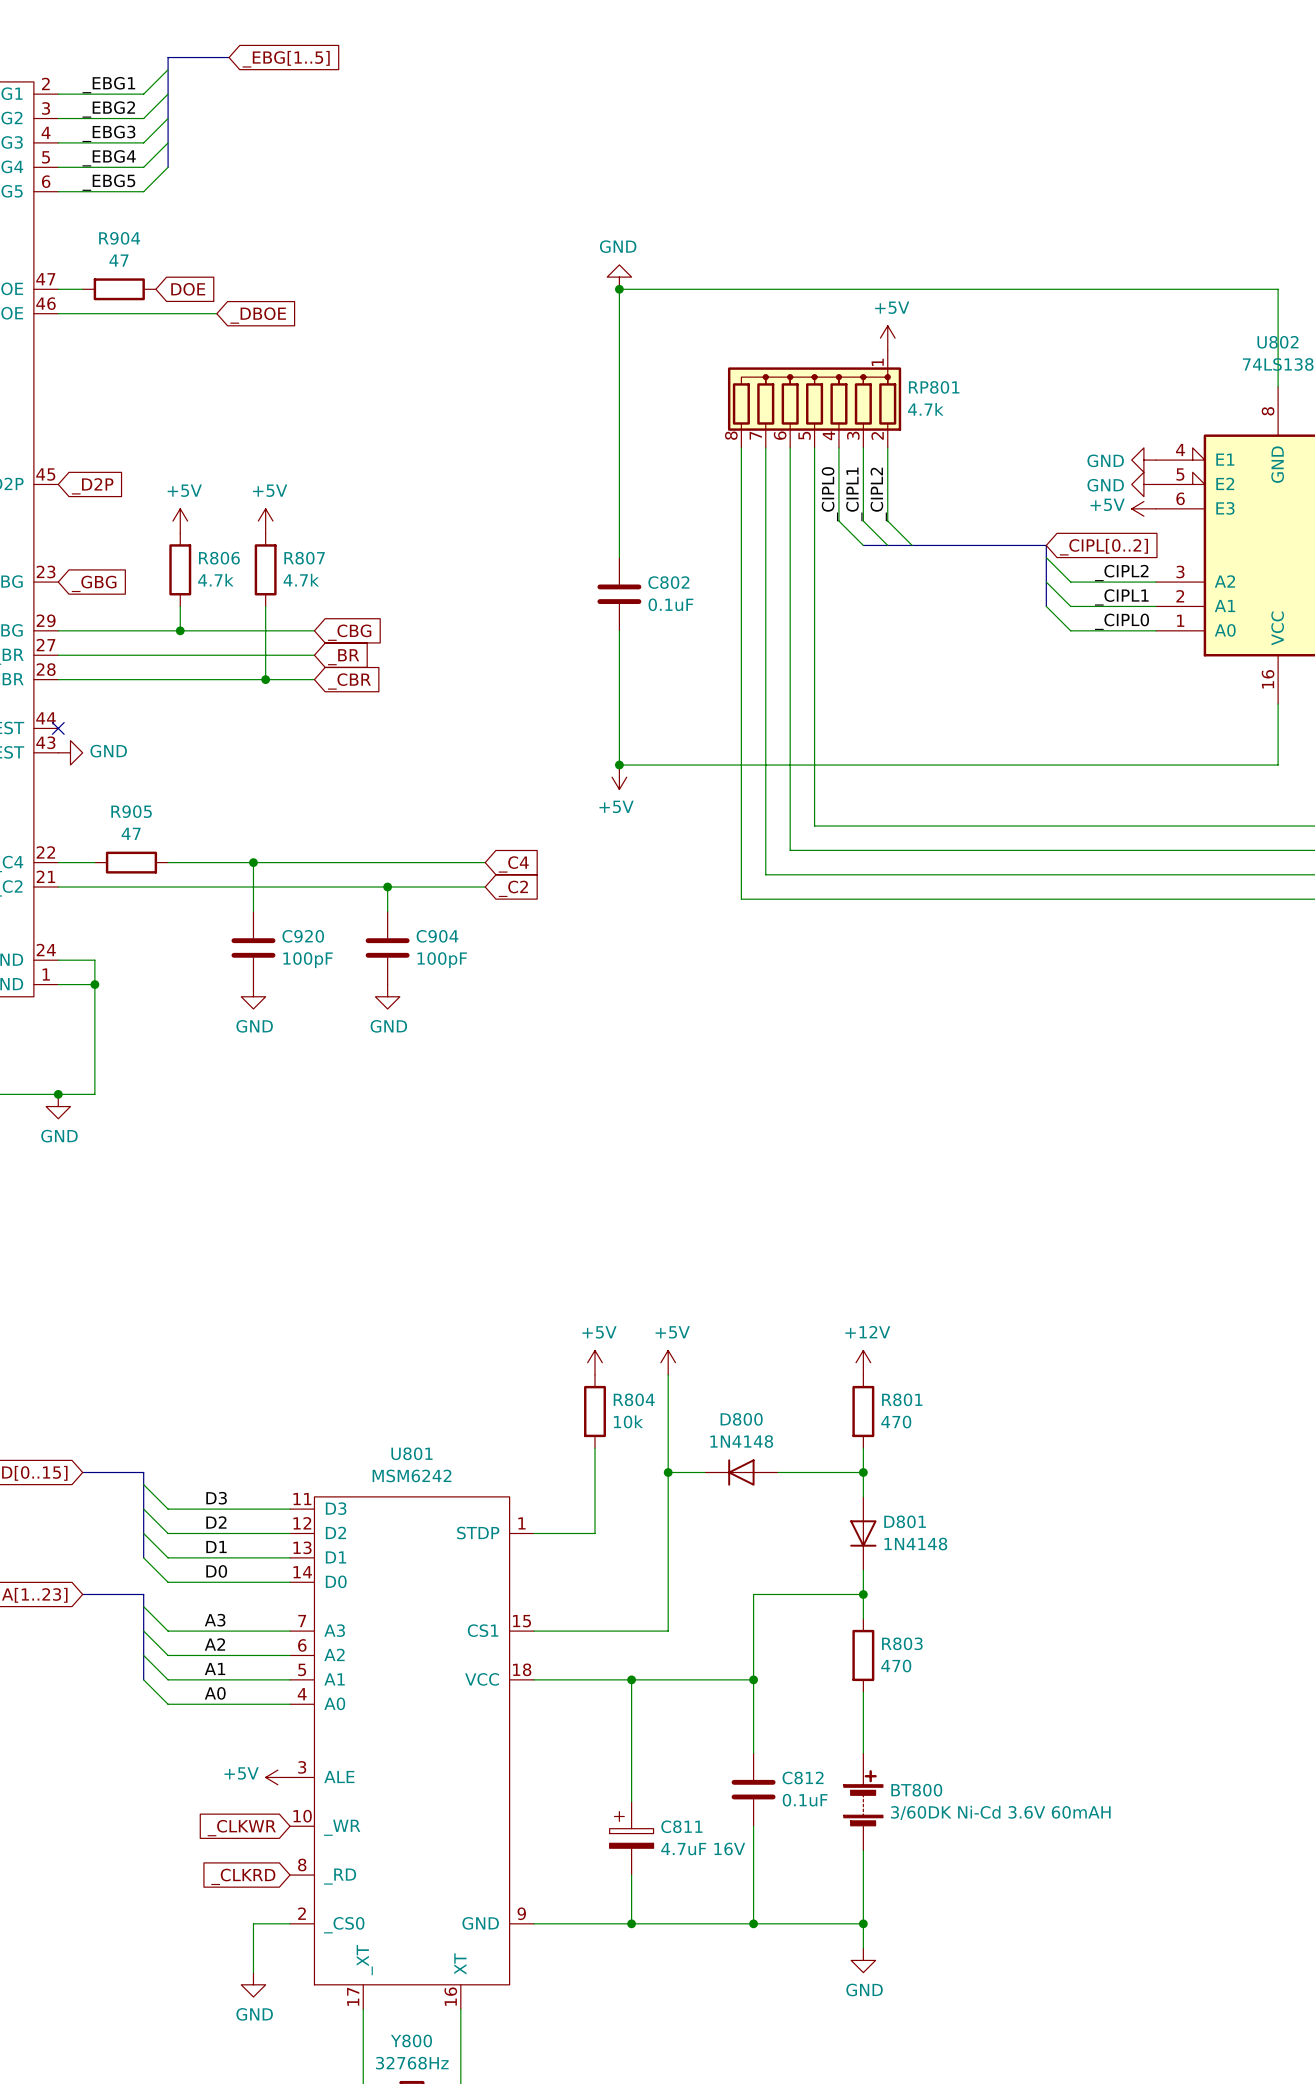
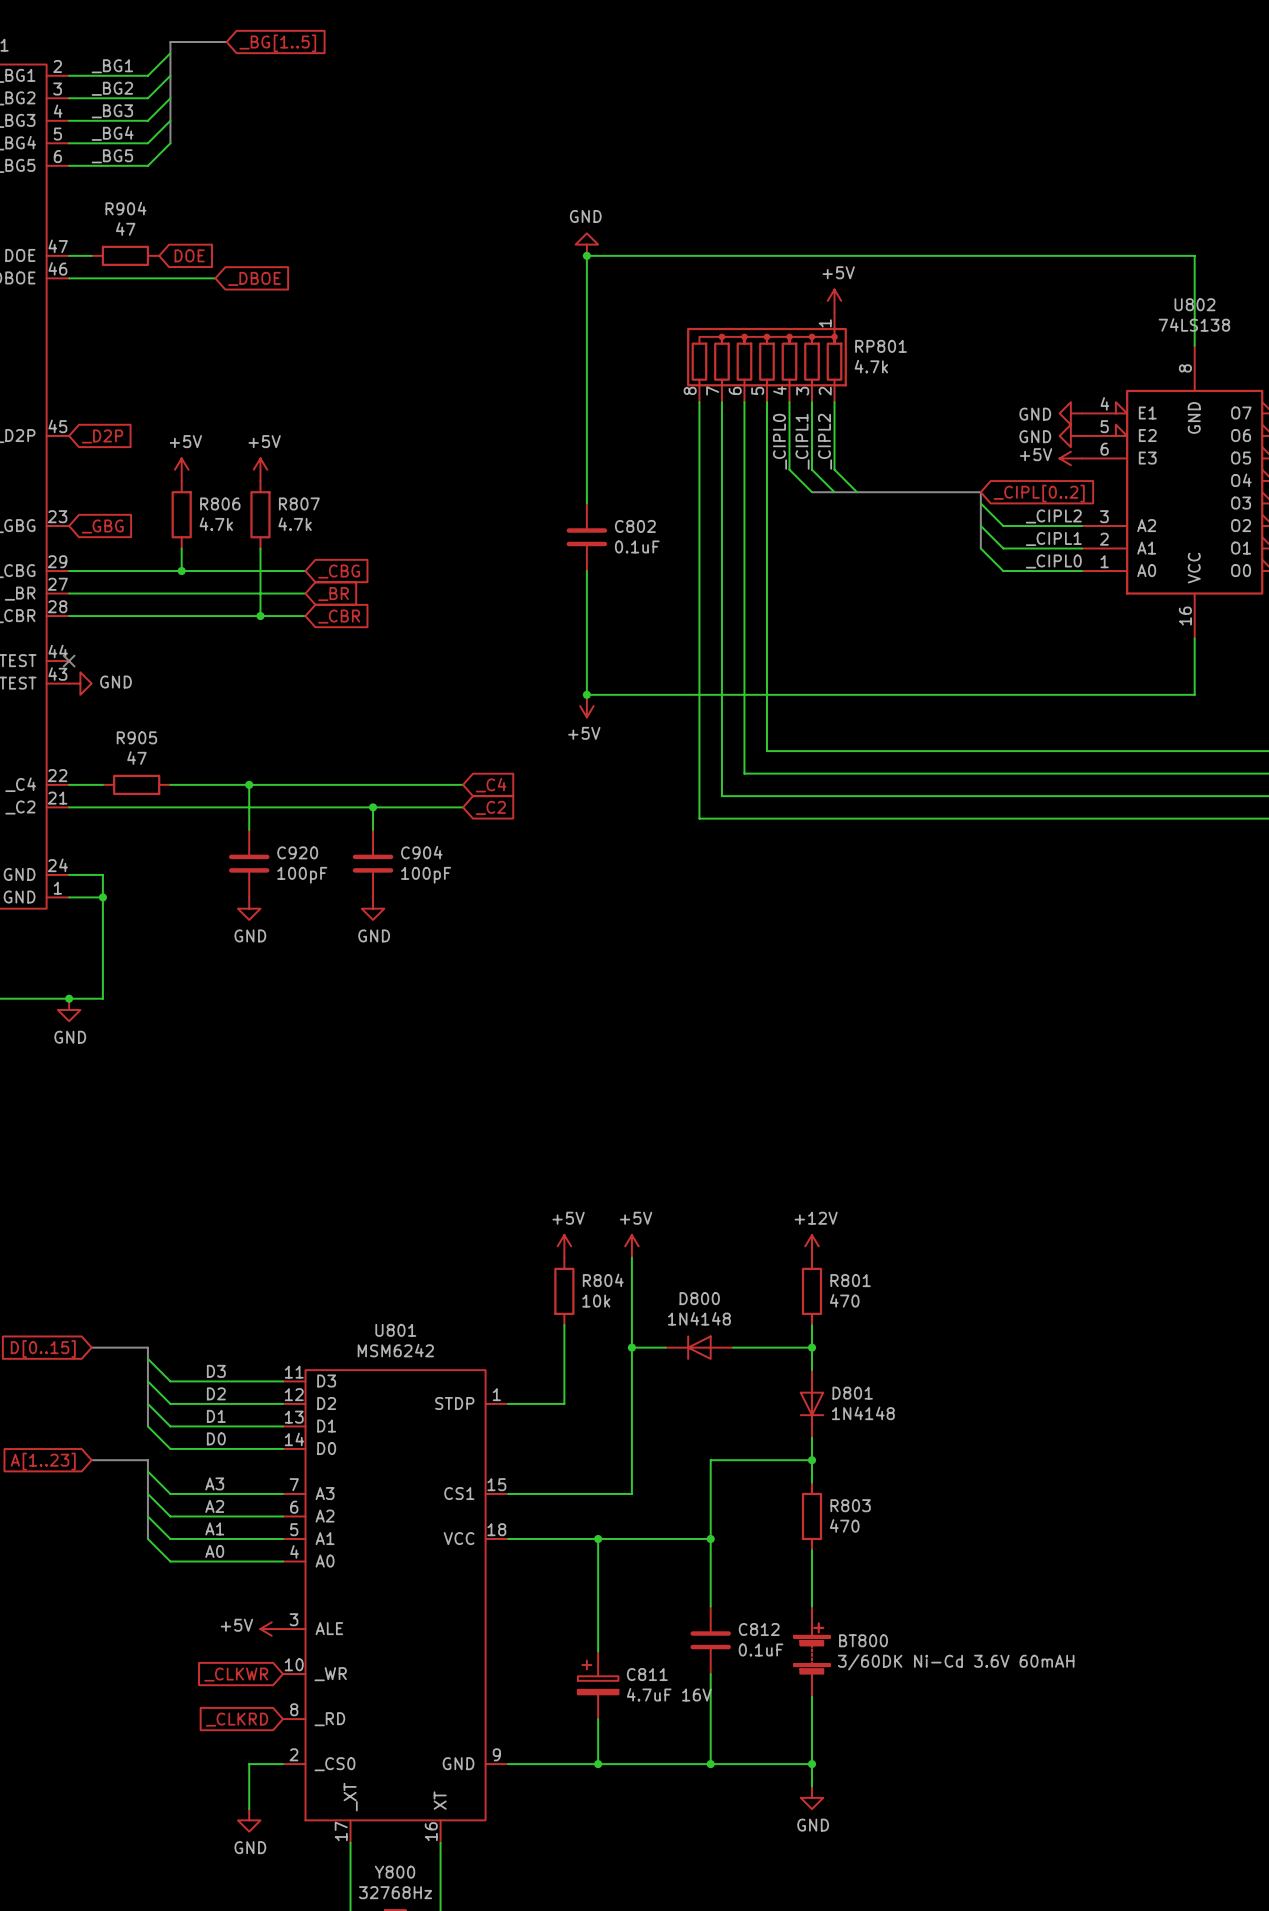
global label: _EBG[1..5] (286, 59) -> _BG[1..5] (277, 43)
label: _EBG1 (108, 85) -> _BG1 (112, 66)
label: _EBG2 (108, 109) -> _BG2 (112, 88)
label: _EBG3 (108, 133) -> _BG3 (112, 111)
label: _EBG4 (109, 158) -> _BG4 (112, 133)
label: _EBG5 (108, 182) -> _BG5 (112, 156)

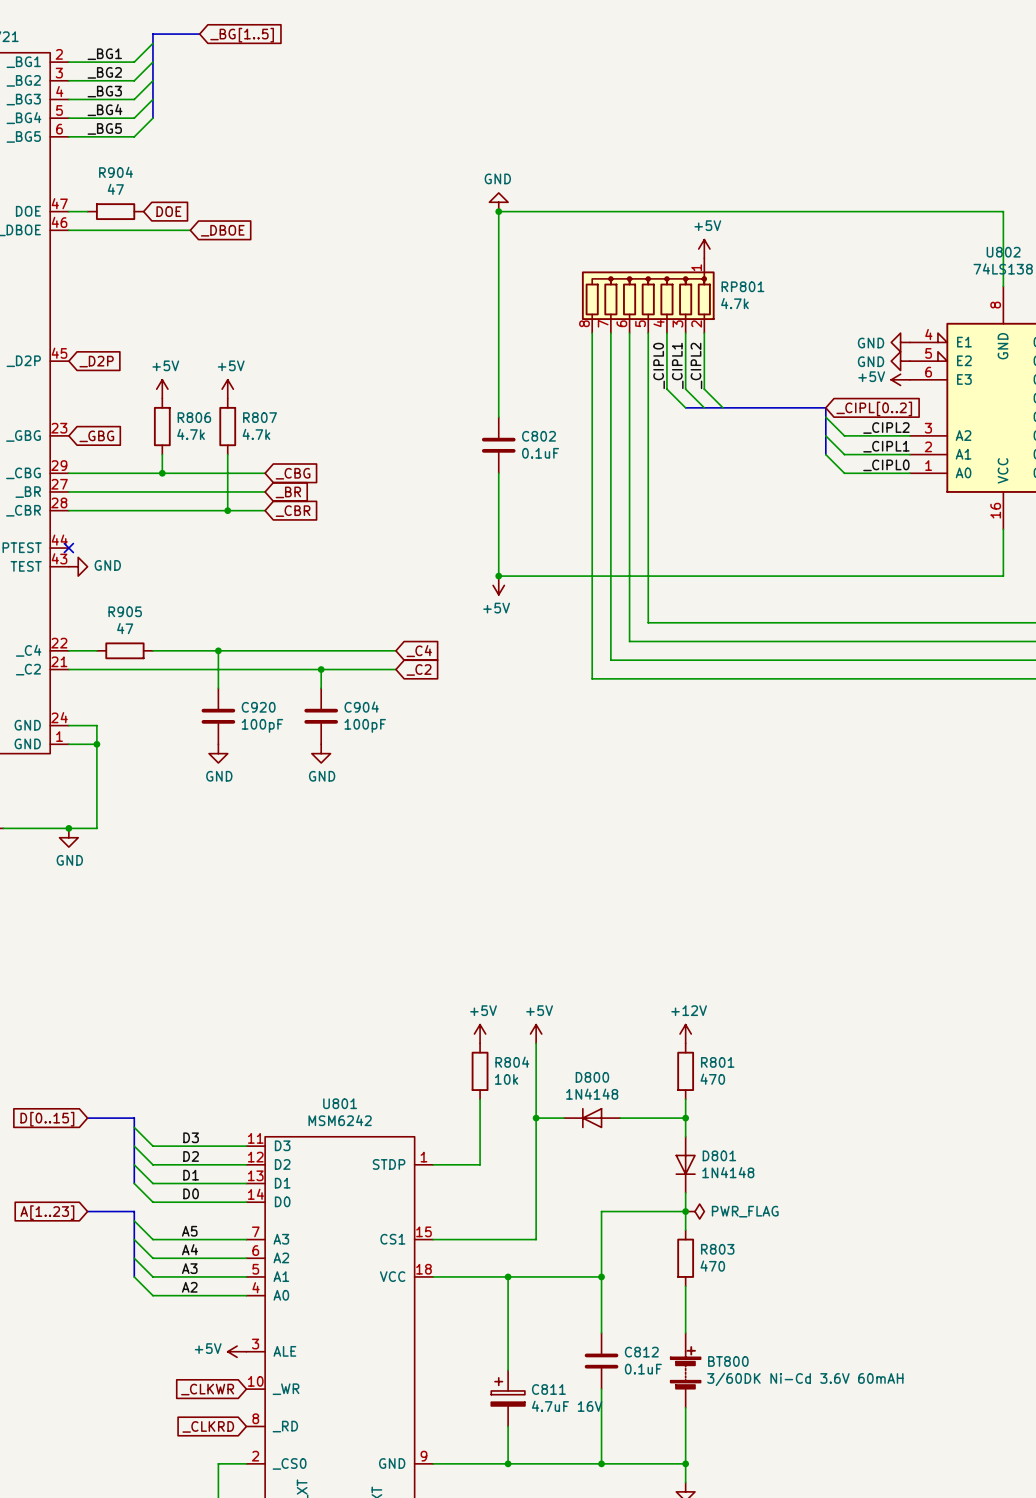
power symbol: none -> PWR_FLAG (694, 1211)
label: A3 (214, 1483) -> A5 (189, 1231)
label: A2 (214, 1506) -> A4 (189, 1249)
label: A1 (214, 1528) -> A3 (189, 1268)
label: A0 (214, 1551) -> A2 (189, 1287)

